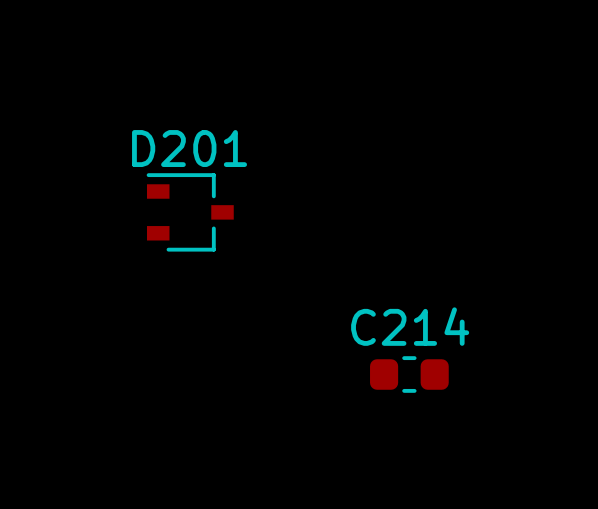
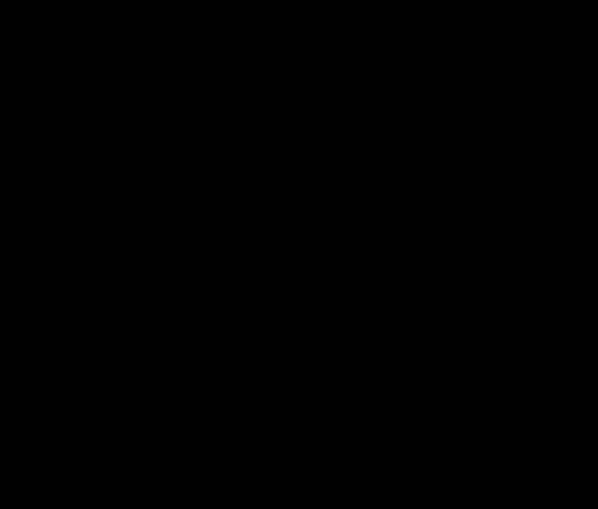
D201: (190, 212) -> none
C214: (409, 374) -> none

